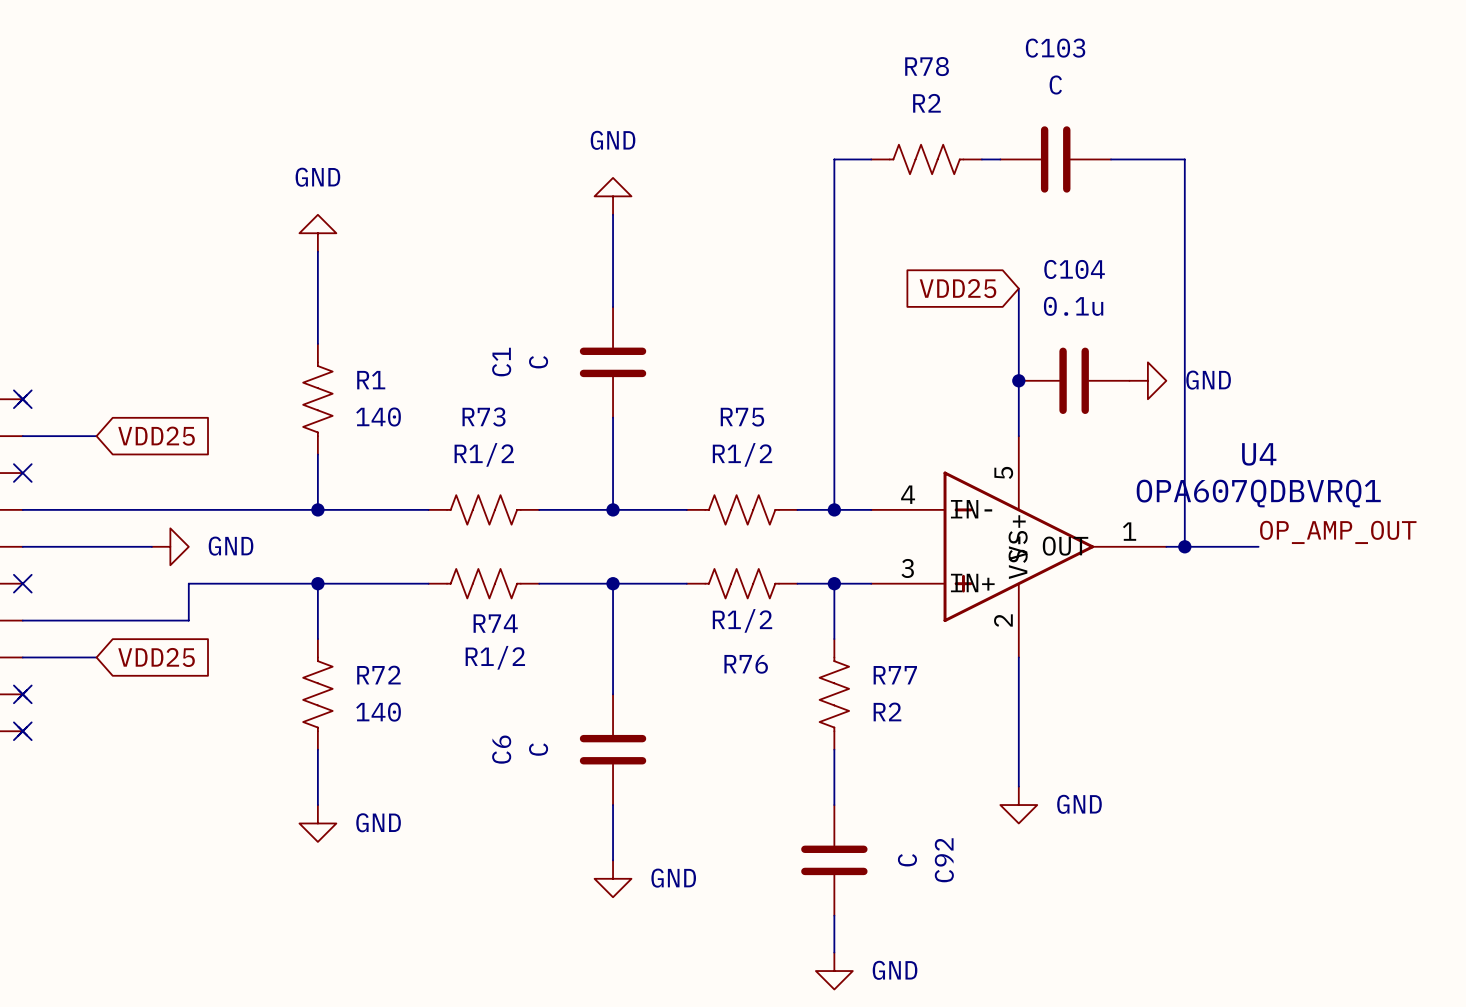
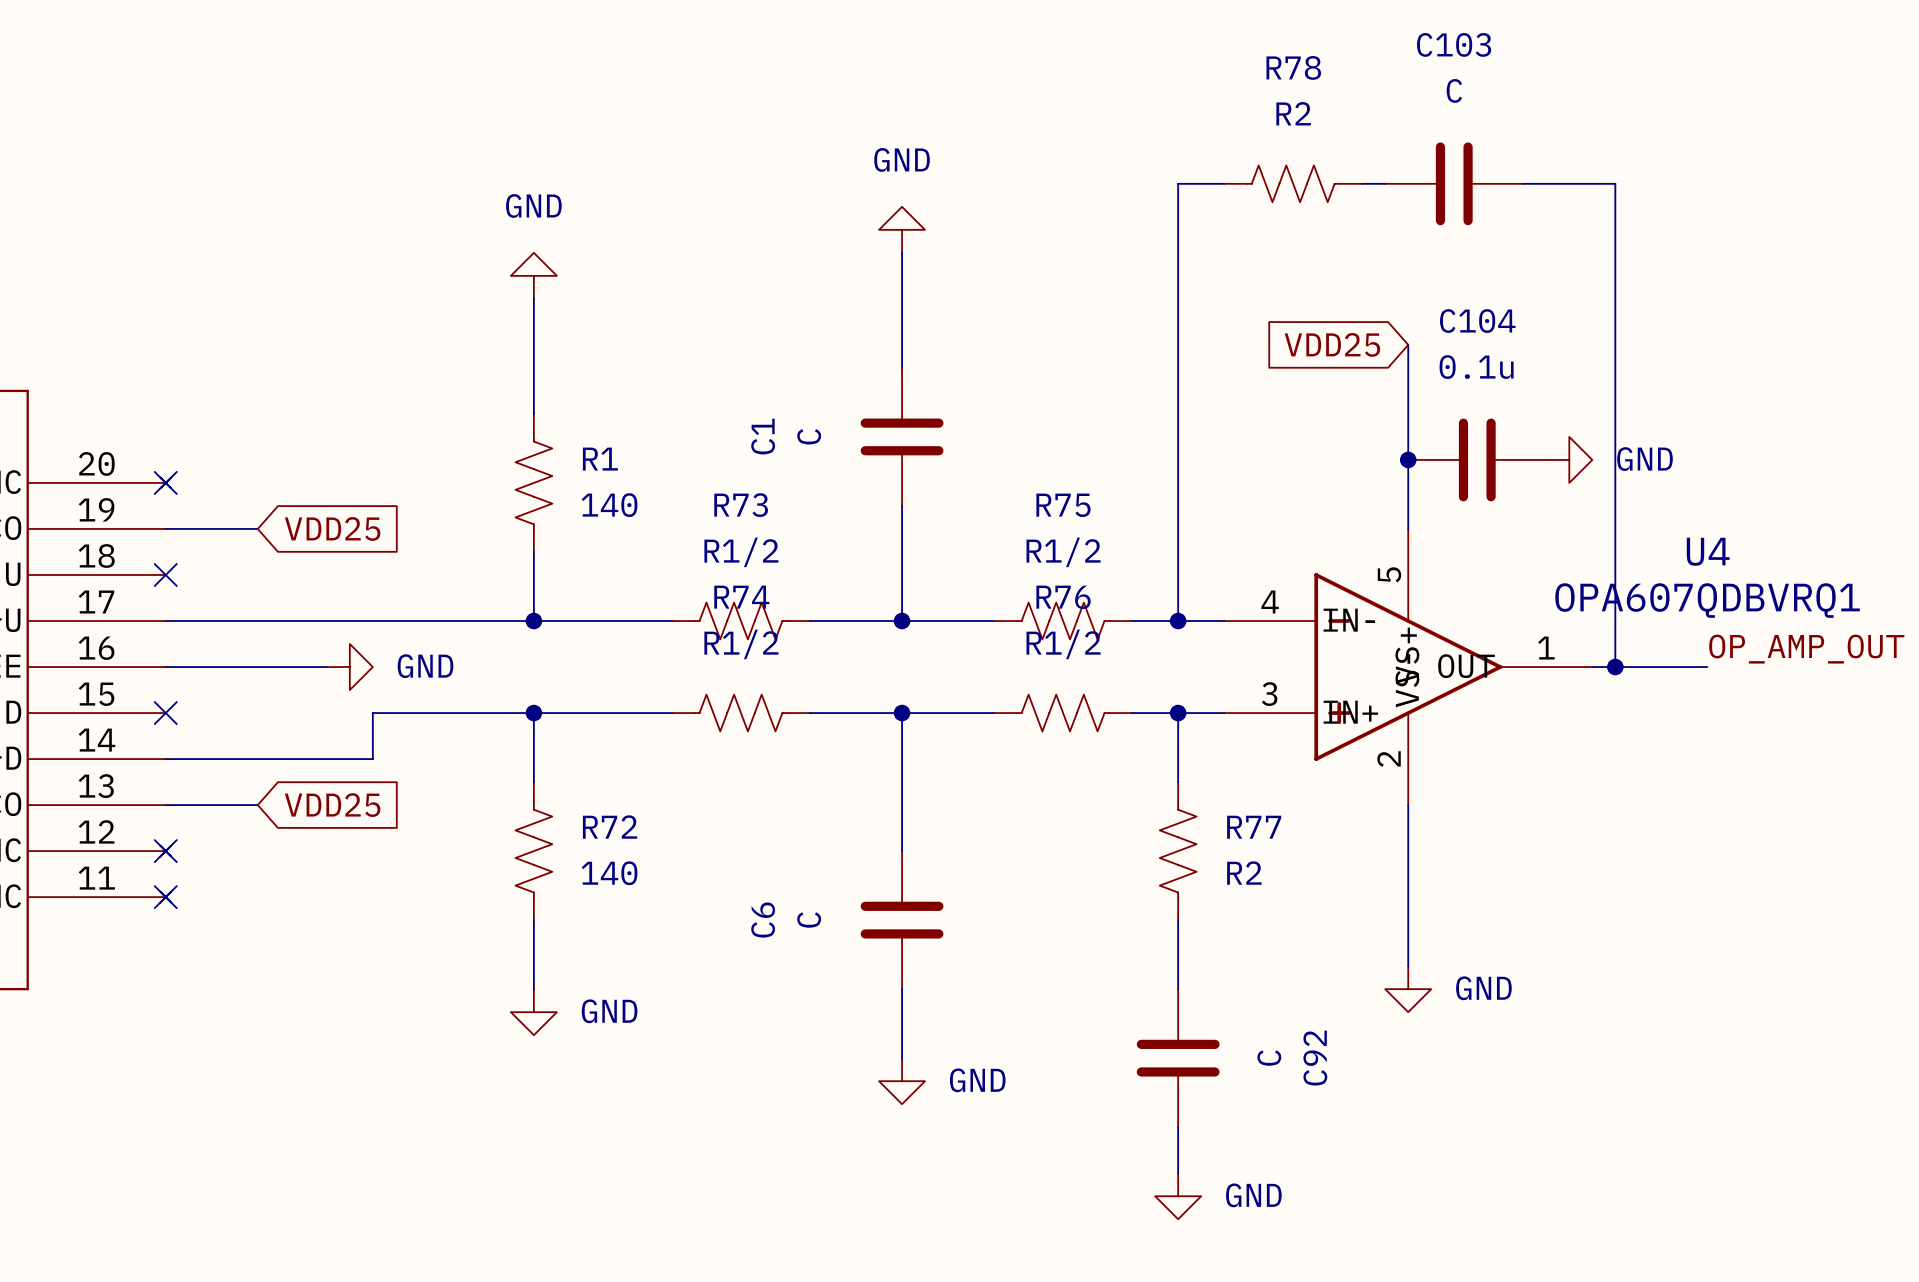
R76 value position: R1/2 (742, 620) -> R1/2 (1063, 644)
R74 name position: R74 (495, 623) -> R74 (741, 597)
R74 value position: R1/2 (495, 657) -> R1/2 (741, 644)
R76 name position: R76 (746, 664) -> R76 (1063, 597)

